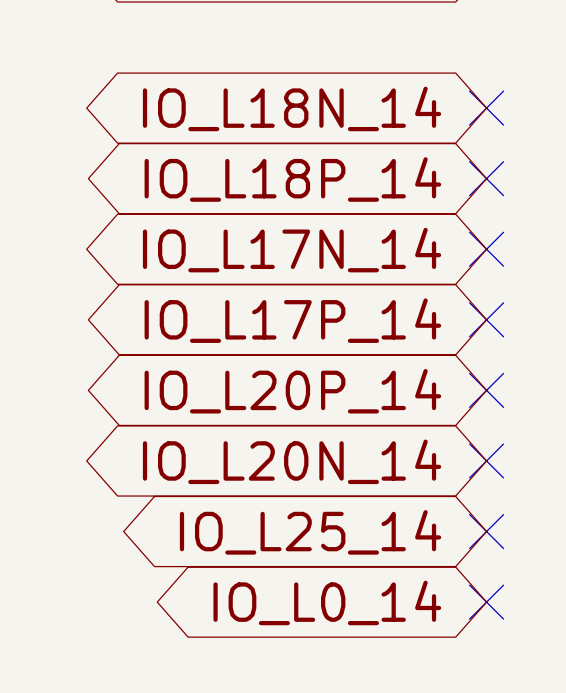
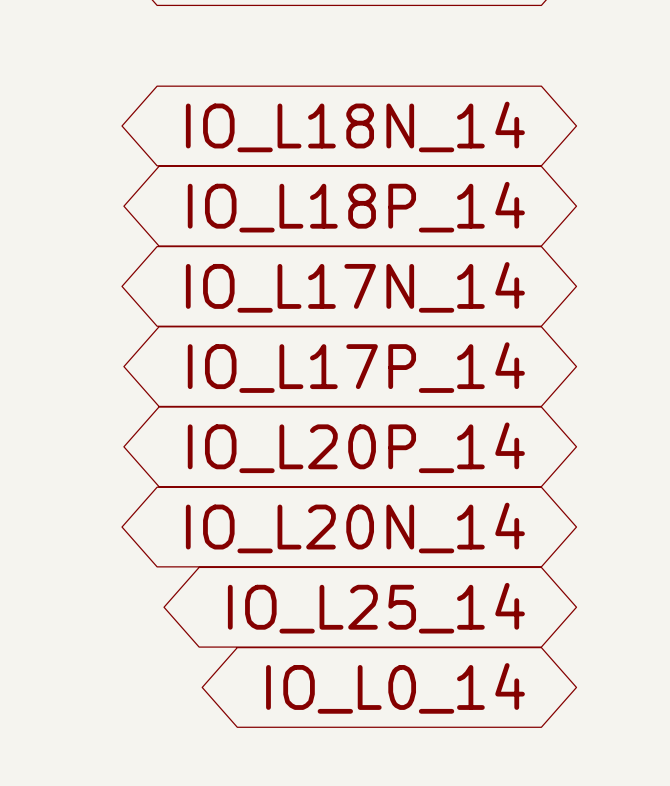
no-connect mark: (486, 108) -> none
no-connect mark: (486, 178) -> none
no-connect mark: (486, 249) -> none
no-connect mark: (486, 319) -> none
no-connect mark: (486, 390) -> none
no-connect mark: (486, 460) -> none
no-connect mark: (486, 531) -> none
no-connect mark: (486, 602) -> none

